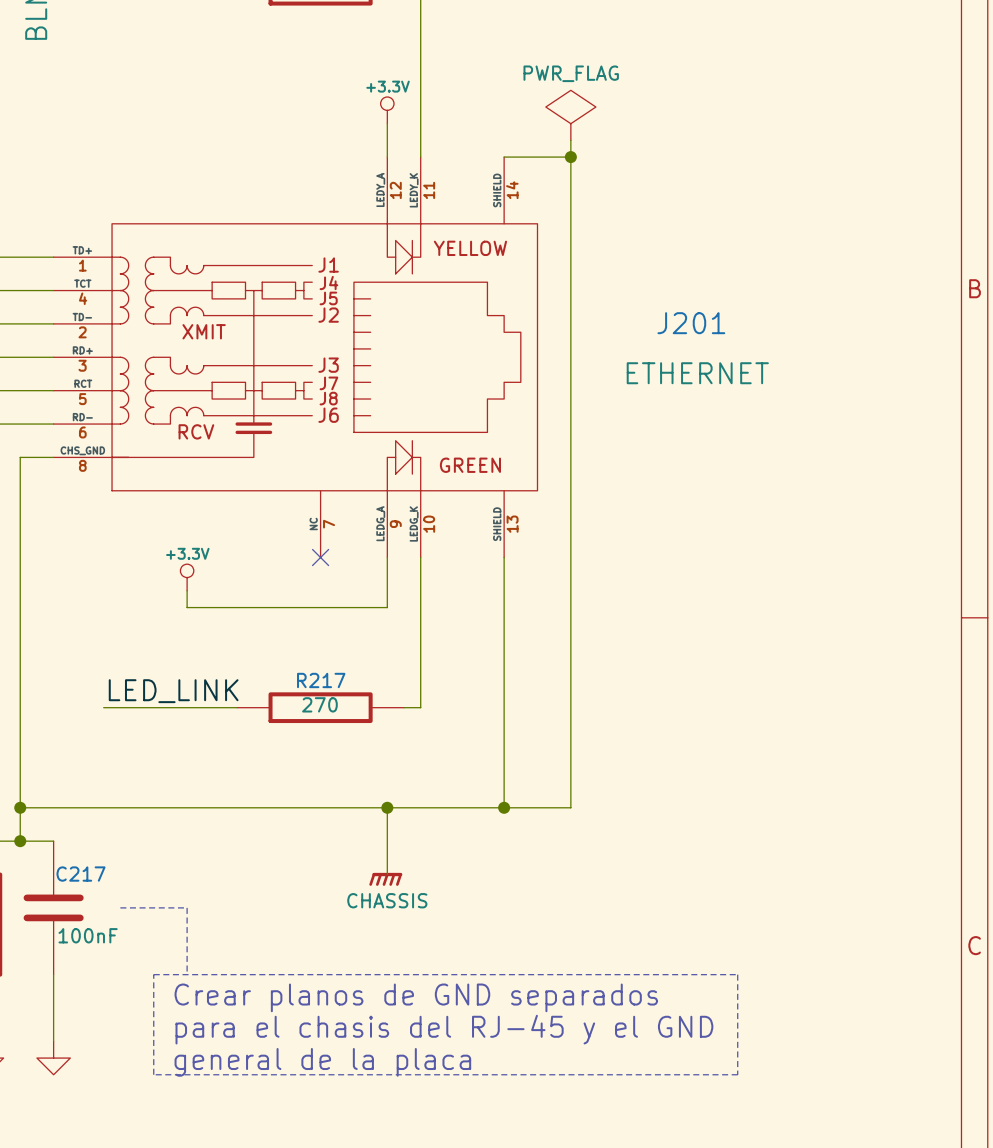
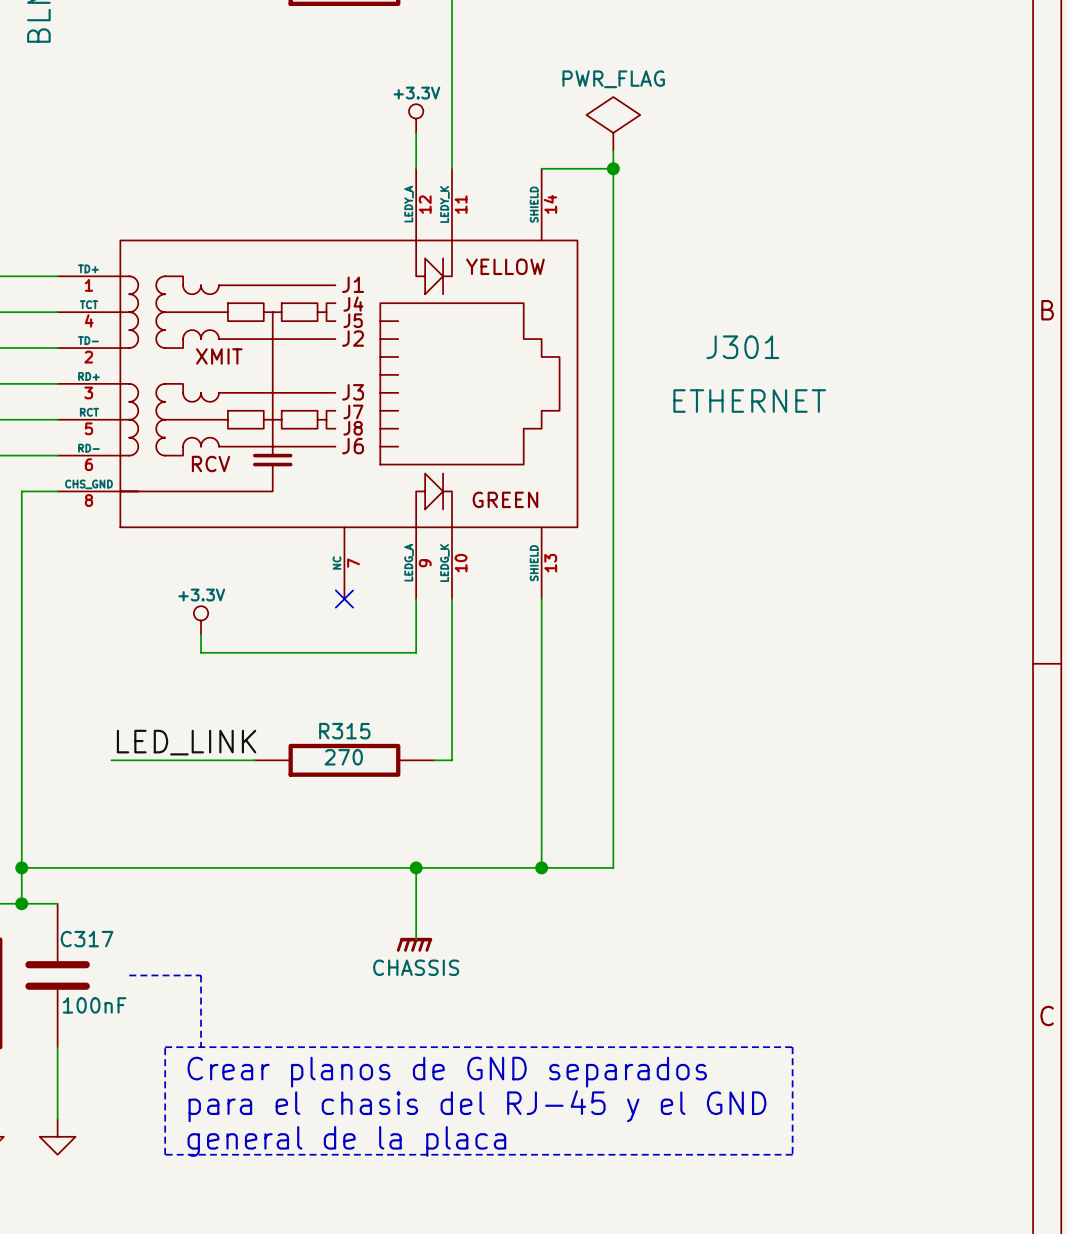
J201 name: J201 (691, 323) -> J301 (742, 347)
R217 name: R217 (321, 680) -> R315 (344, 731)
C217 name: C217 (81, 874) -> C317 (87, 939)

